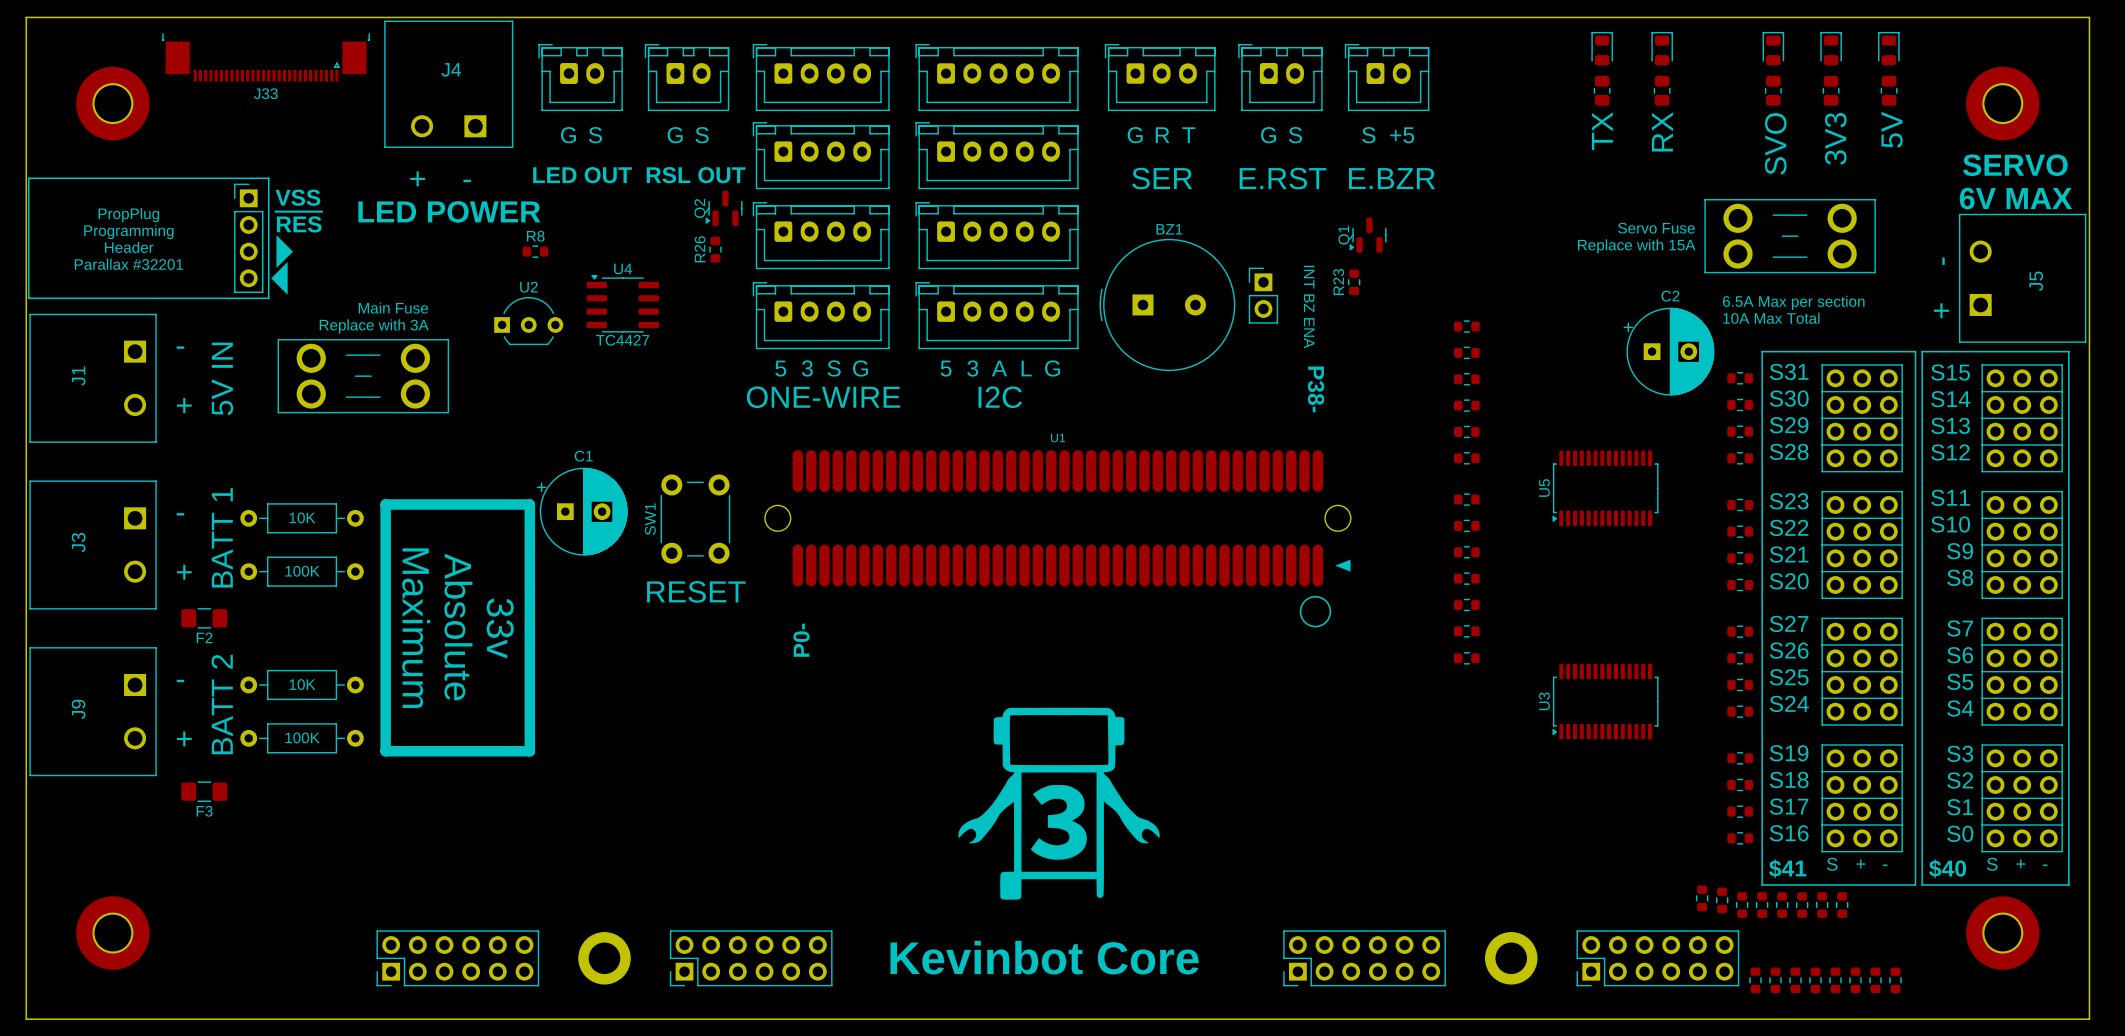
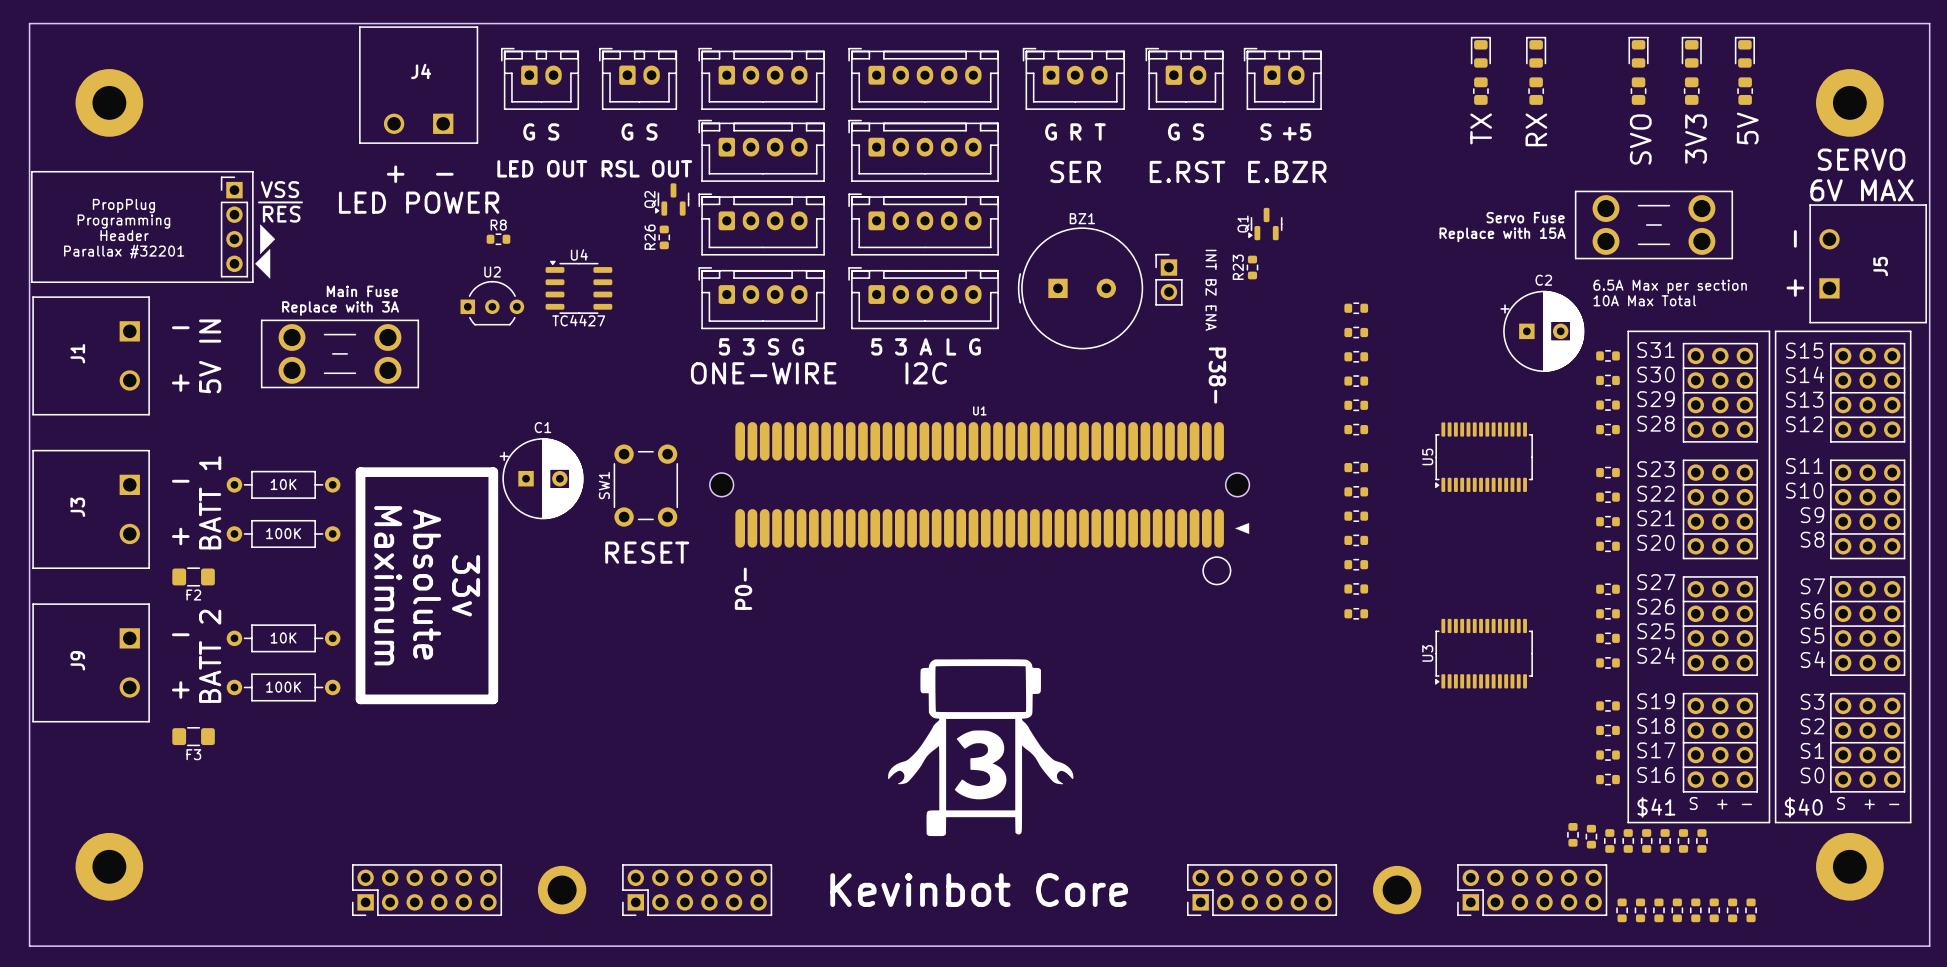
J33: (266, 57) -> none

